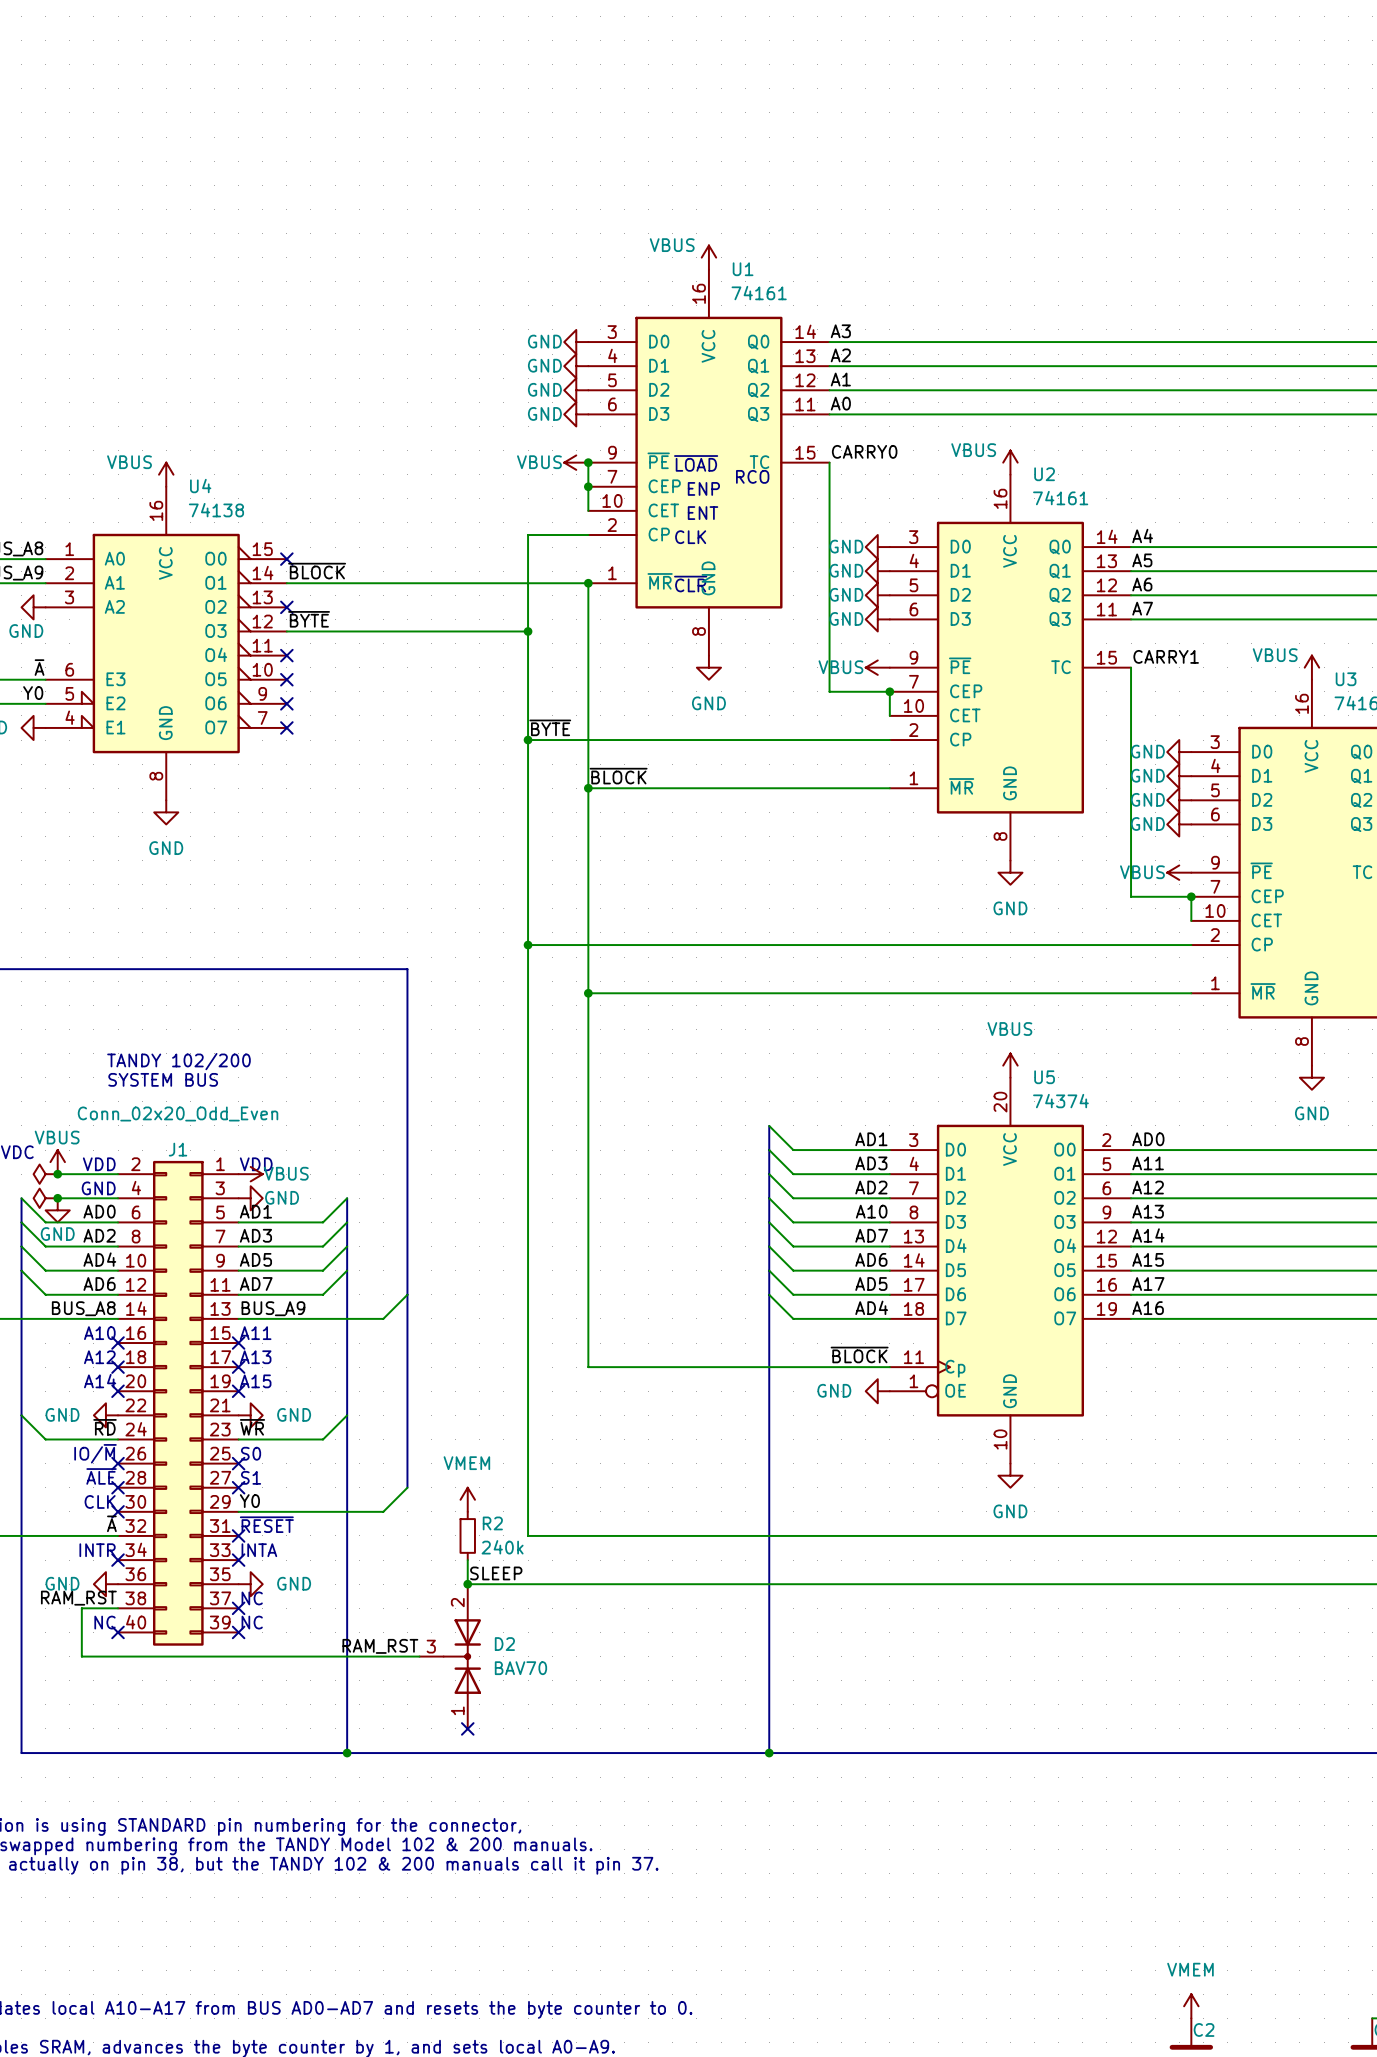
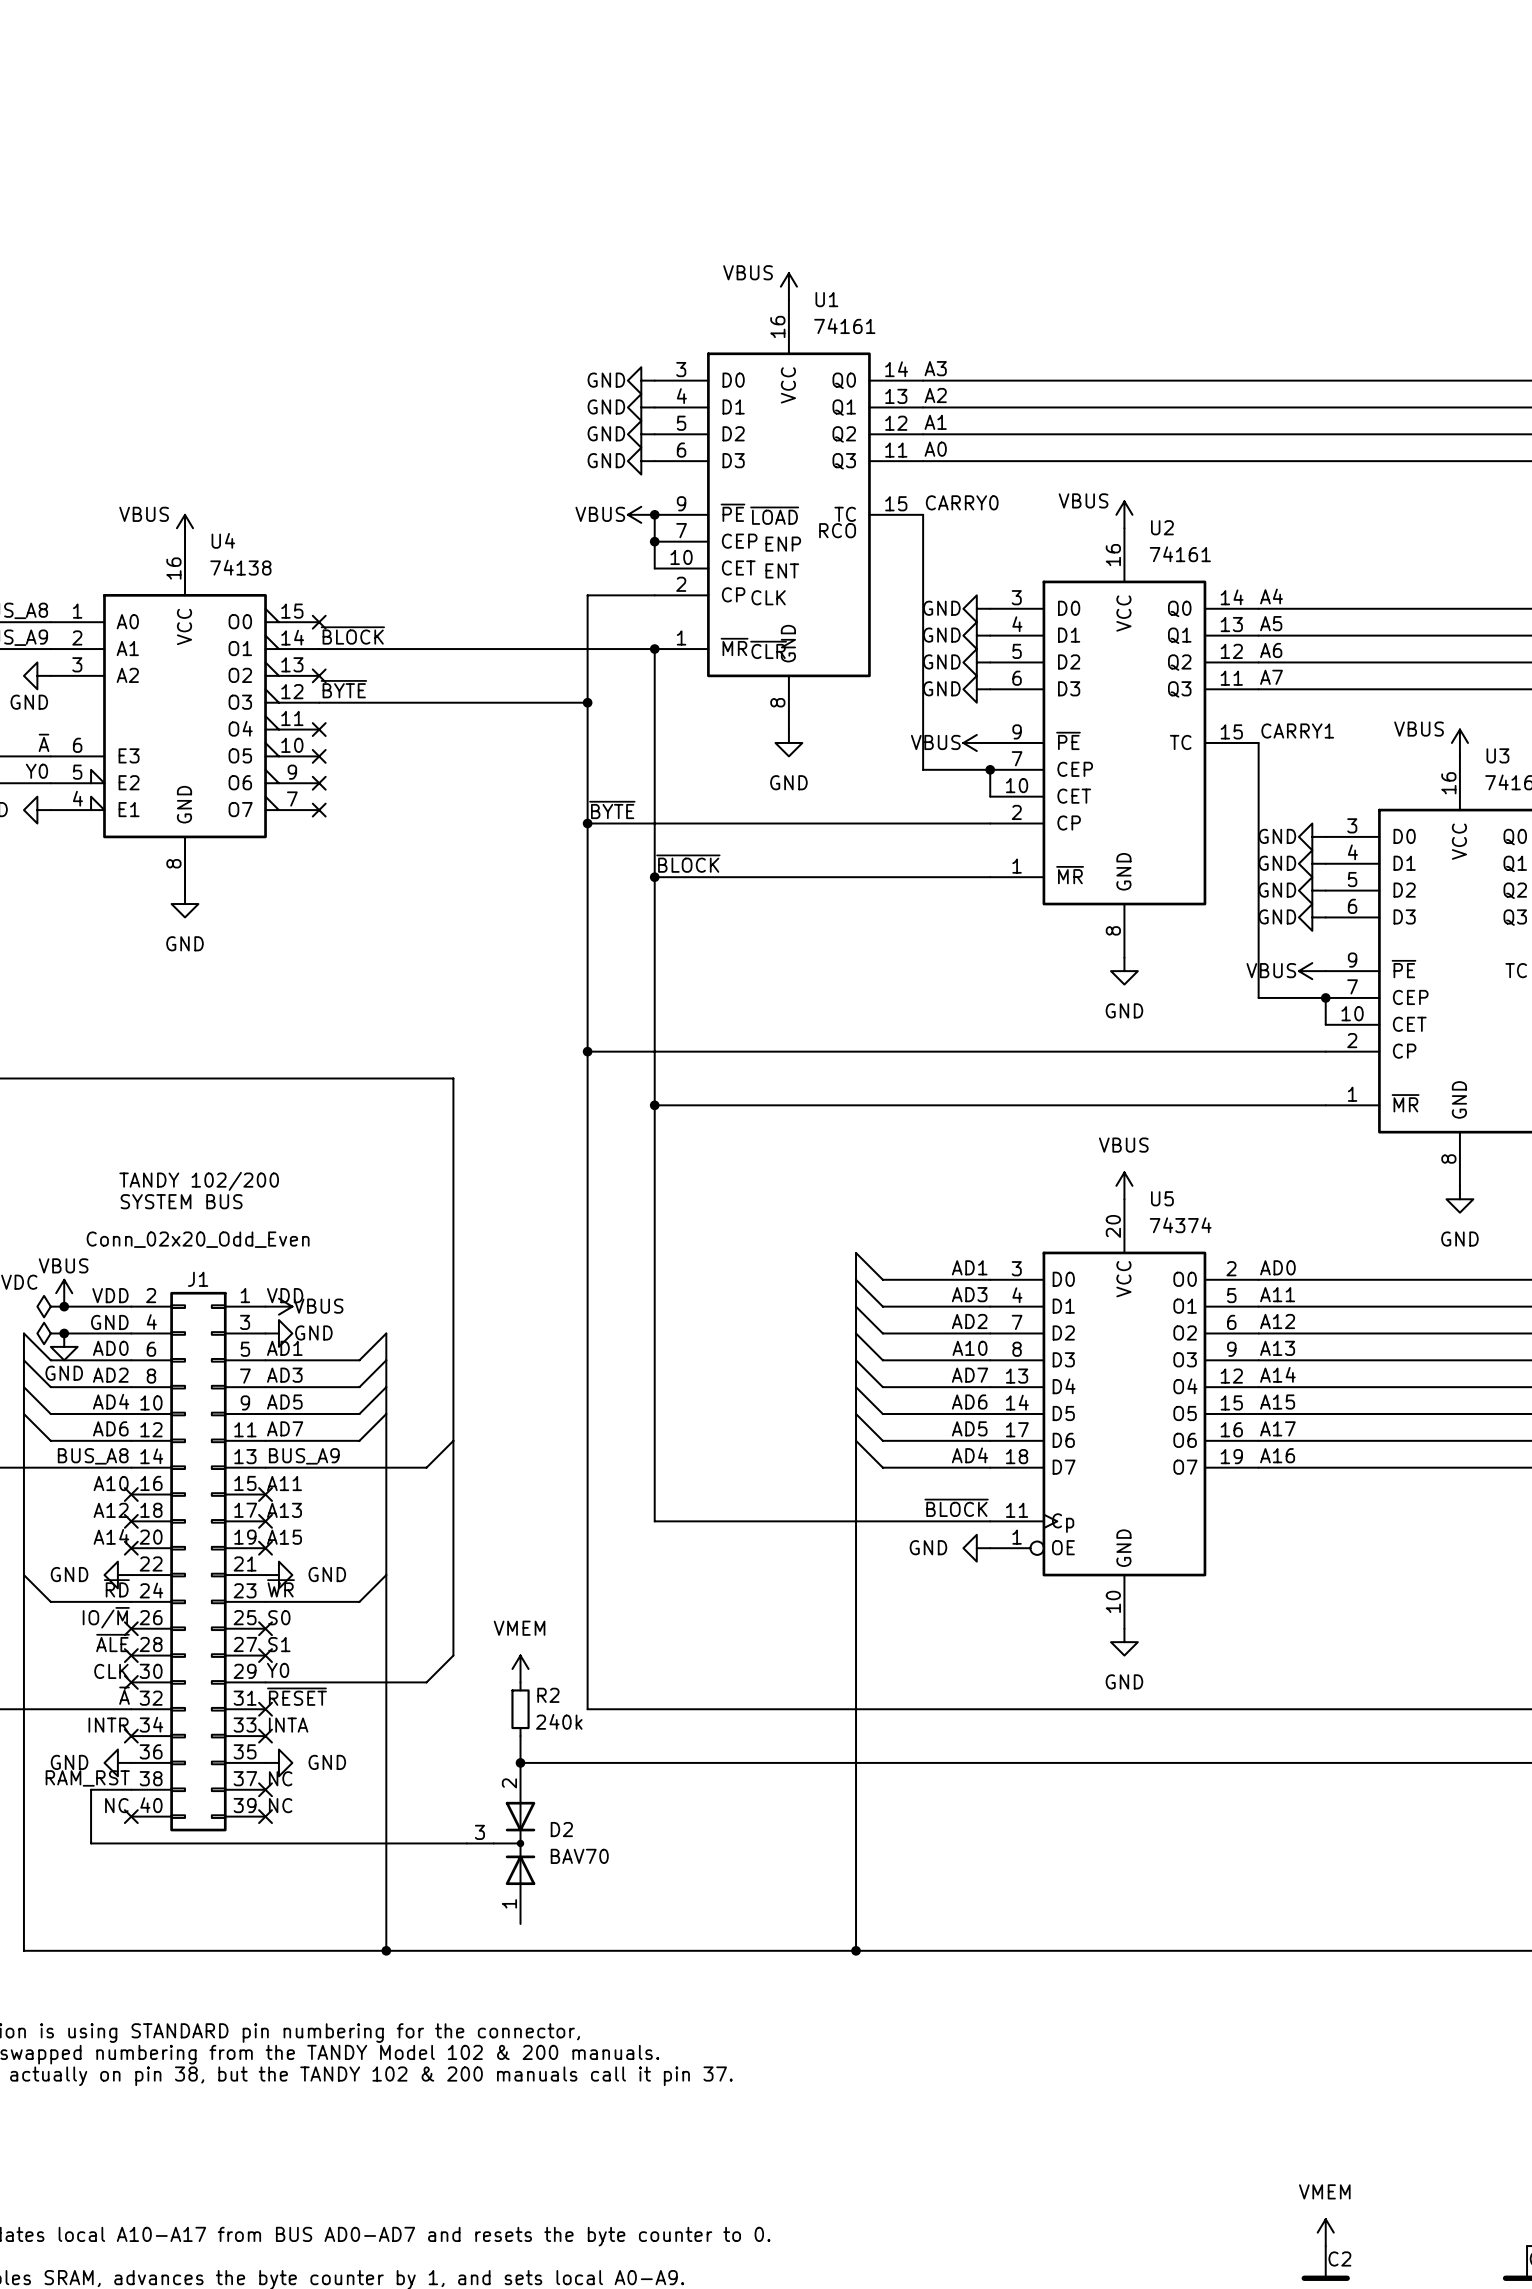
label: SLEEP (496, 1573) -> none
label: RAM_RST (380, 1646) -> none
no-connect mark: (467, 1728) -> none

